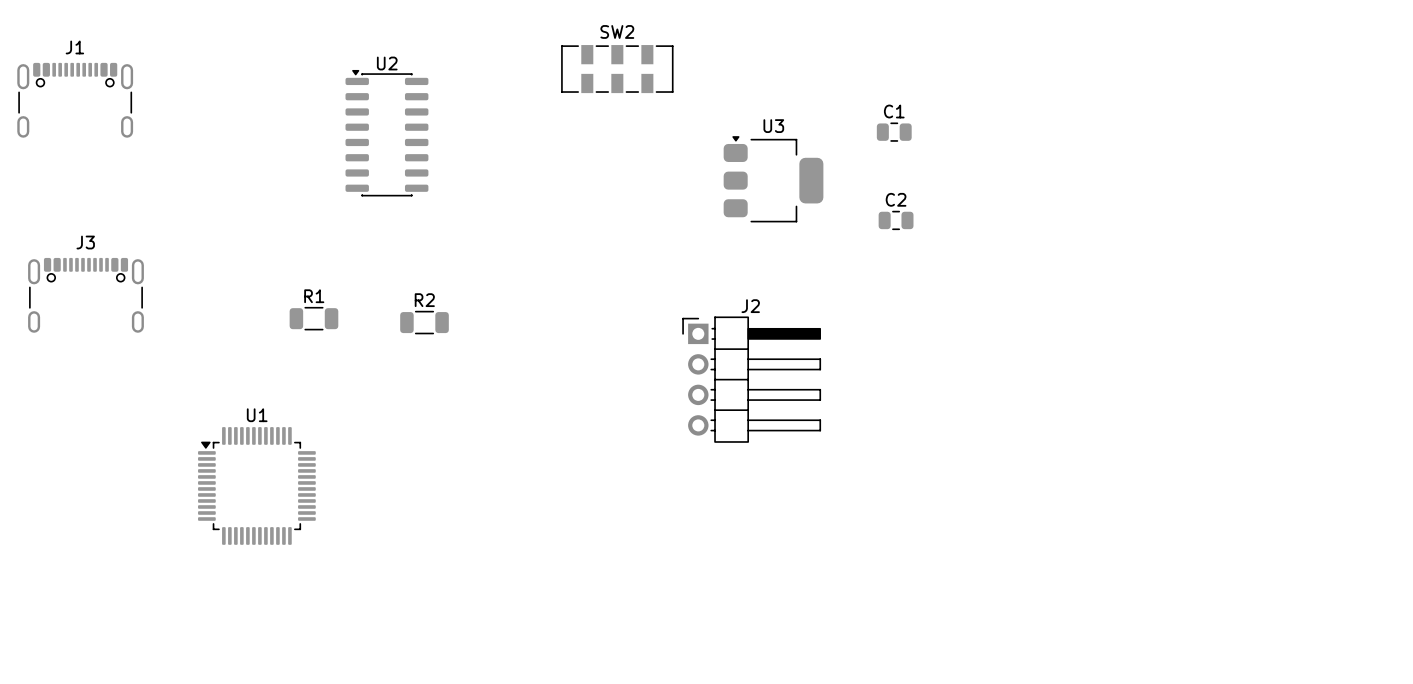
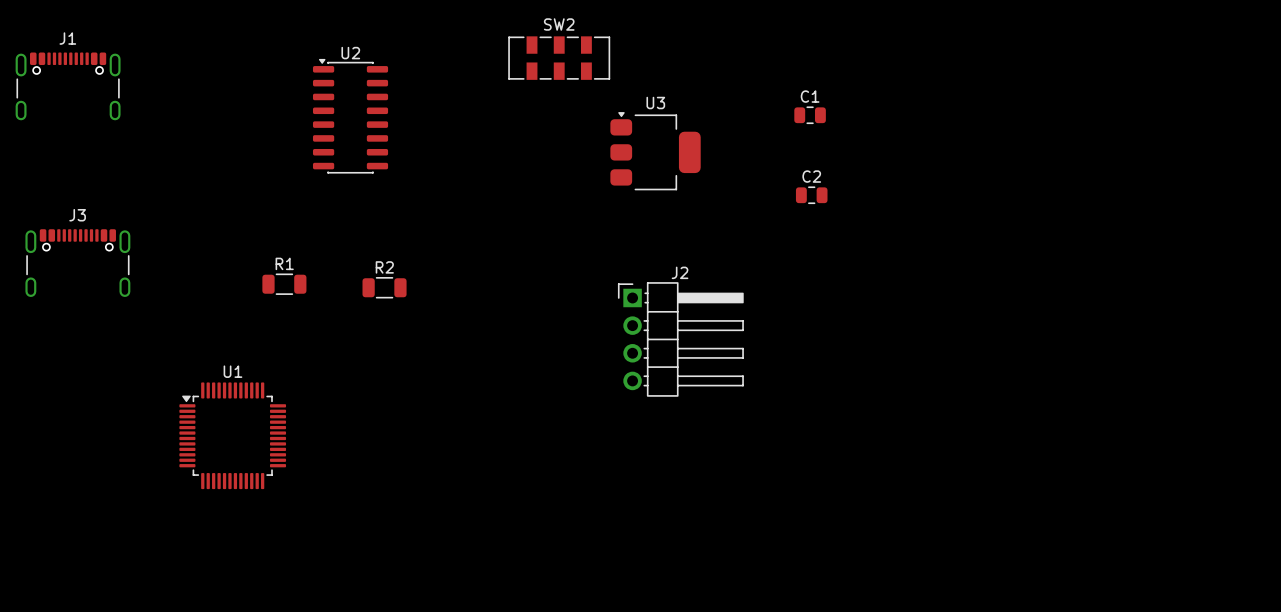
U3 position: (773, 179) -> (655, 151)

